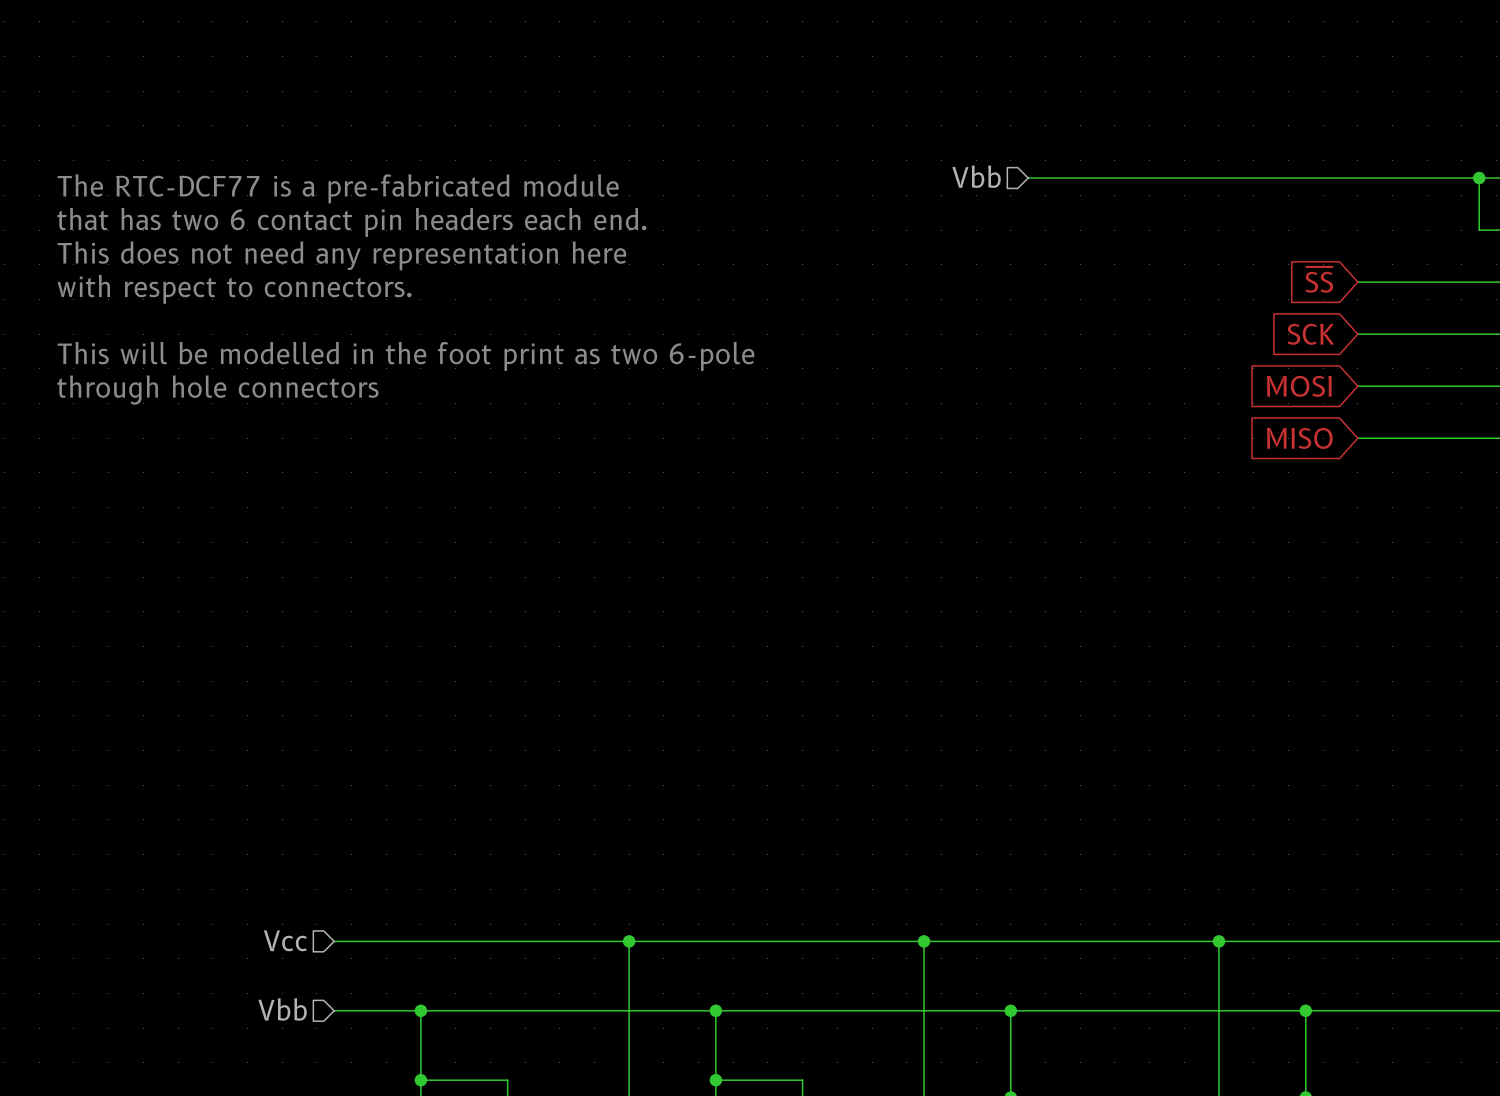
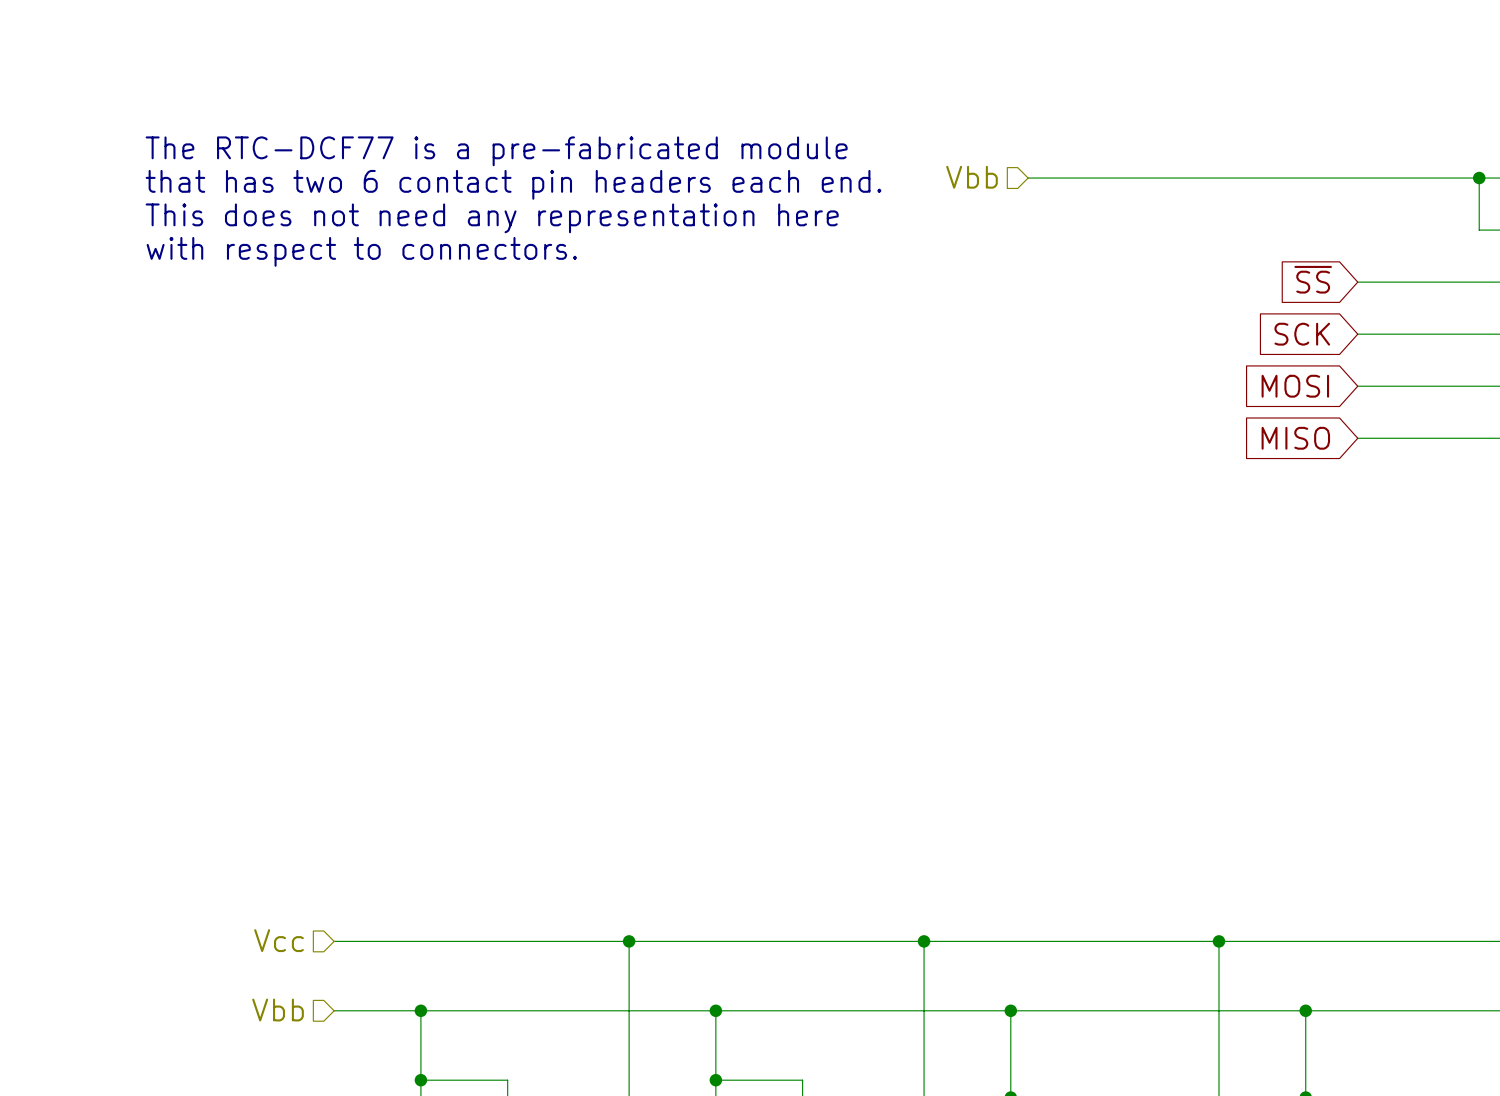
text position: The RTC-DCF77 is a pre-fabricated module (338, 188) -> The RTC-DCF77 is a pre-fabricated module (496, 151)
text position: that has two 6 contact pin headers each end. (351, 222) -> that has two 6 contact pin headers each end. (513, 184)
text position: This does not need any representation here (341, 255) -> This does not need any representation here (492, 218)
text position: with respect to connectors. (234, 289) -> with respect to connectors. (361, 251)
text: This will be modelled in the foot print as two 6-pole (405, 356) -> none
text: through hole connectors (217, 390) -> none

